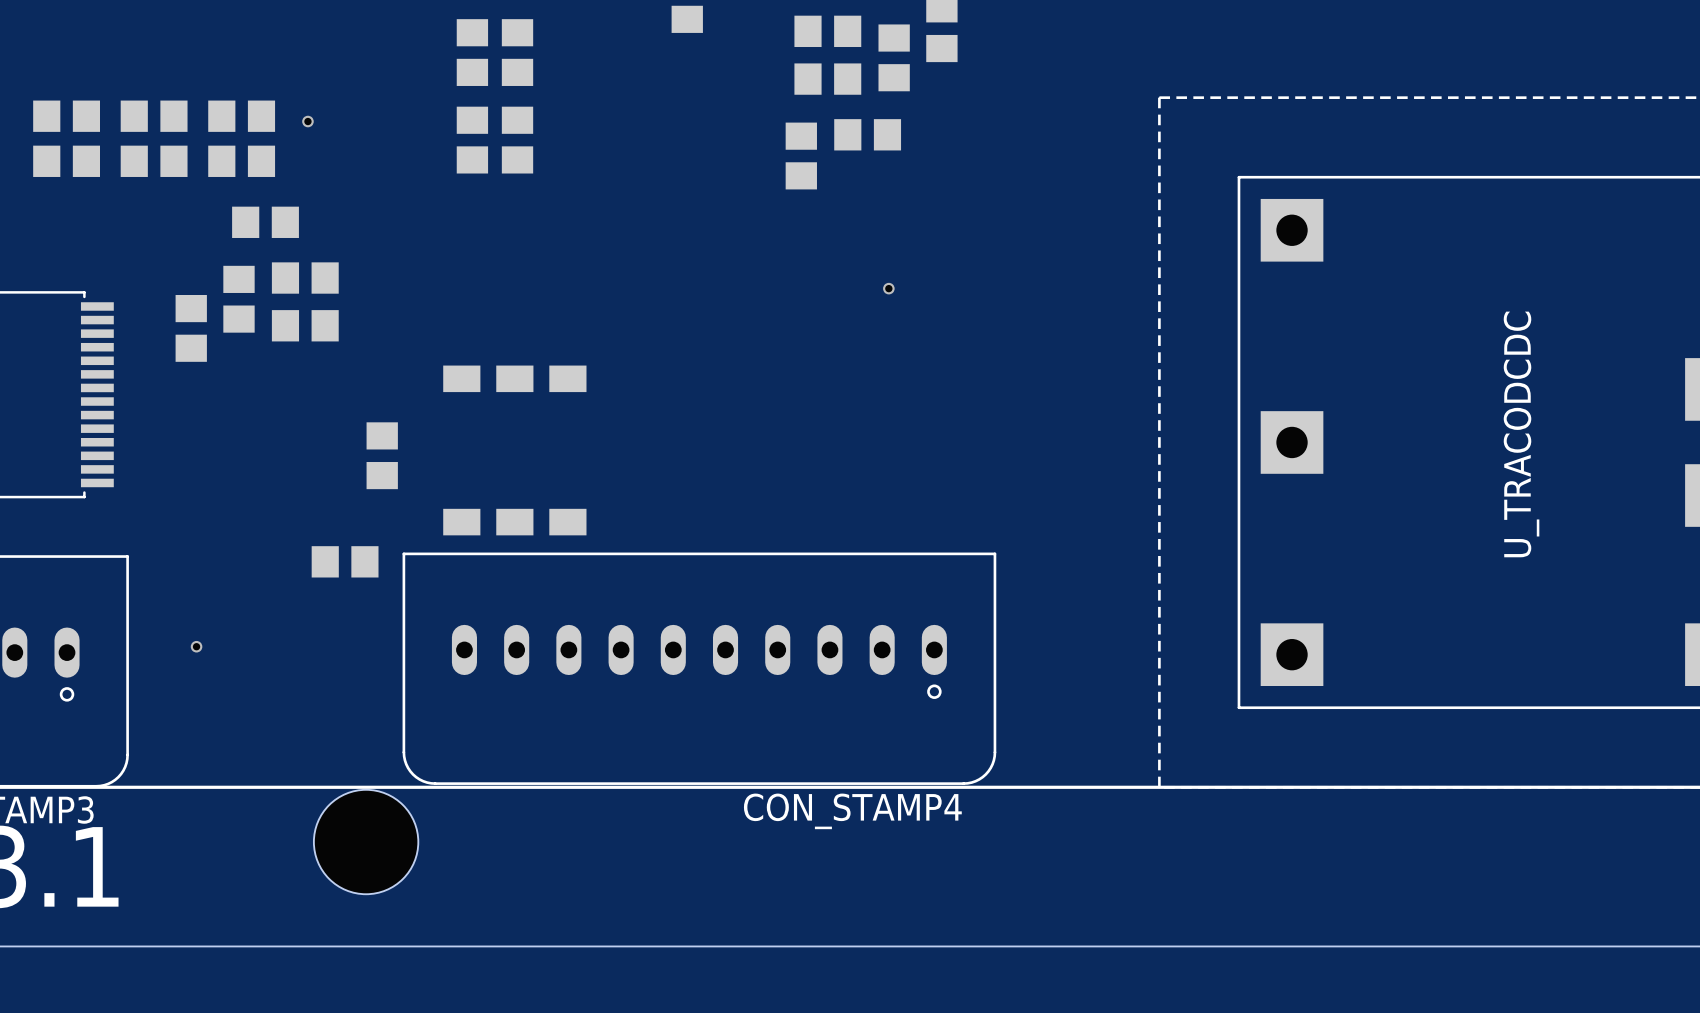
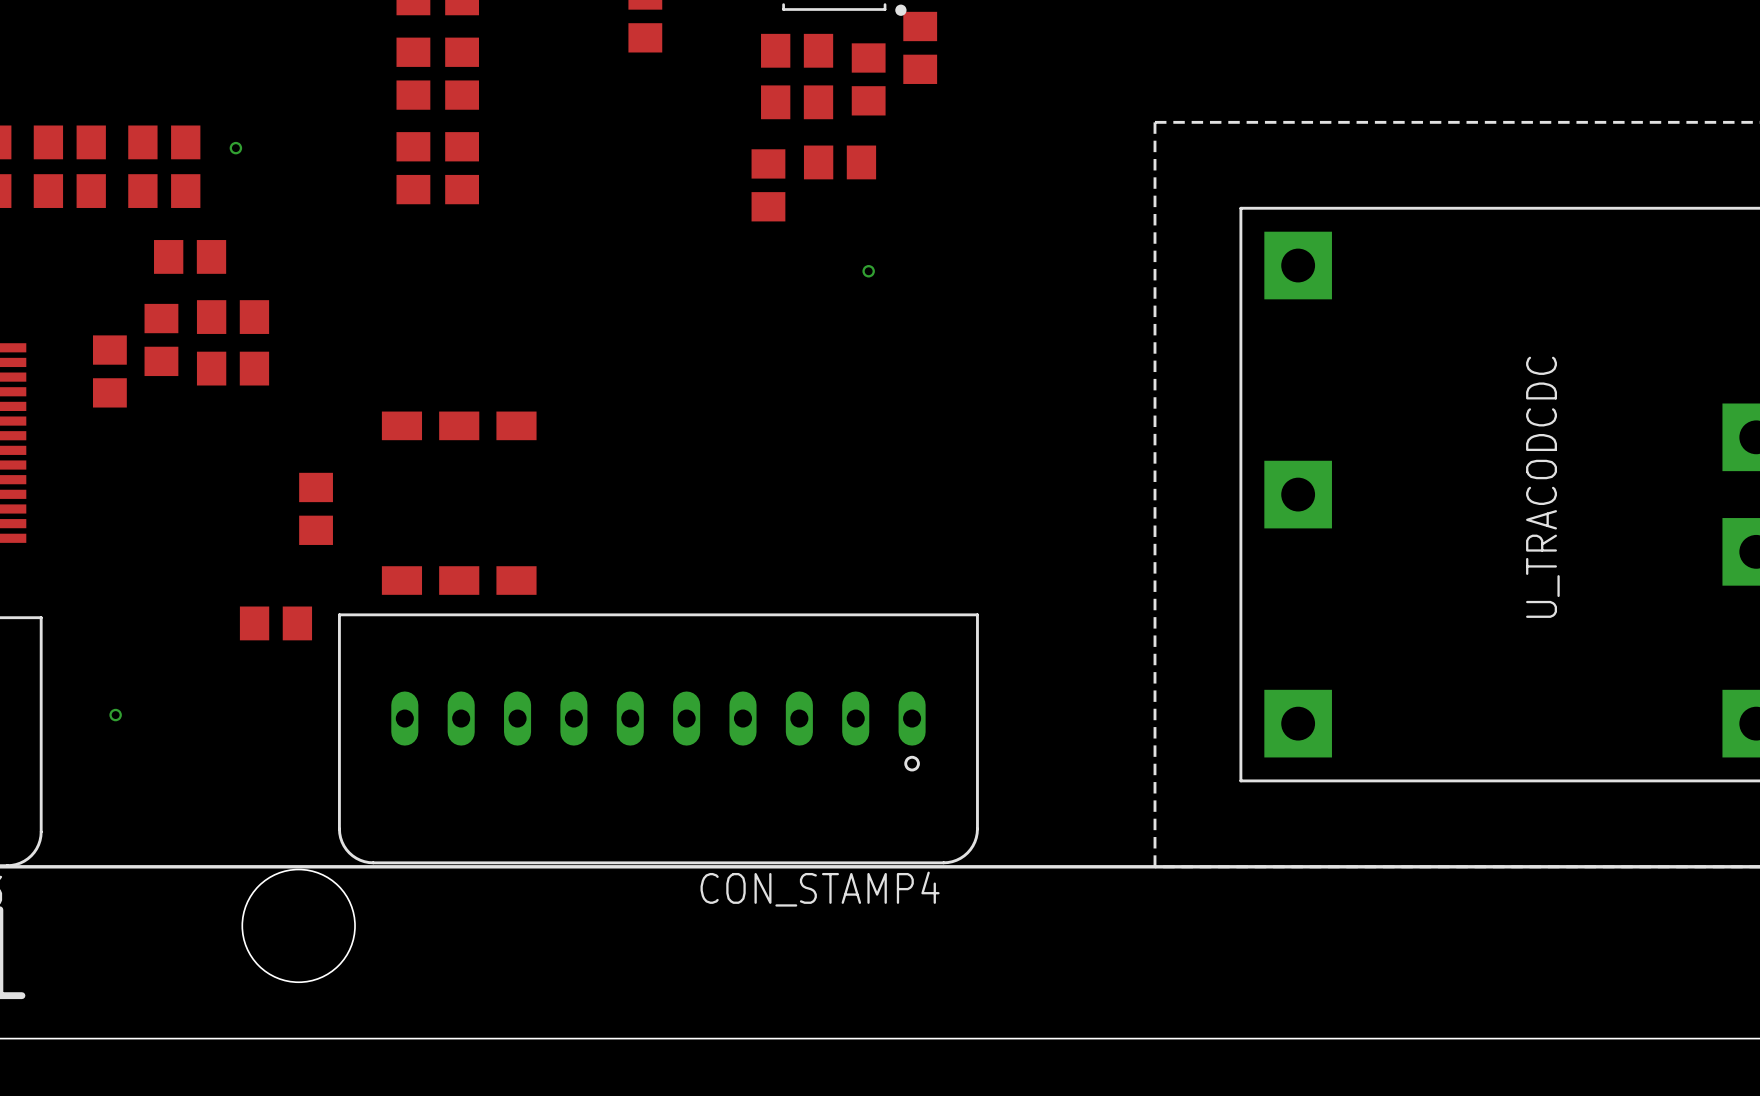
via position: (888, 288) -> (868, 271)

